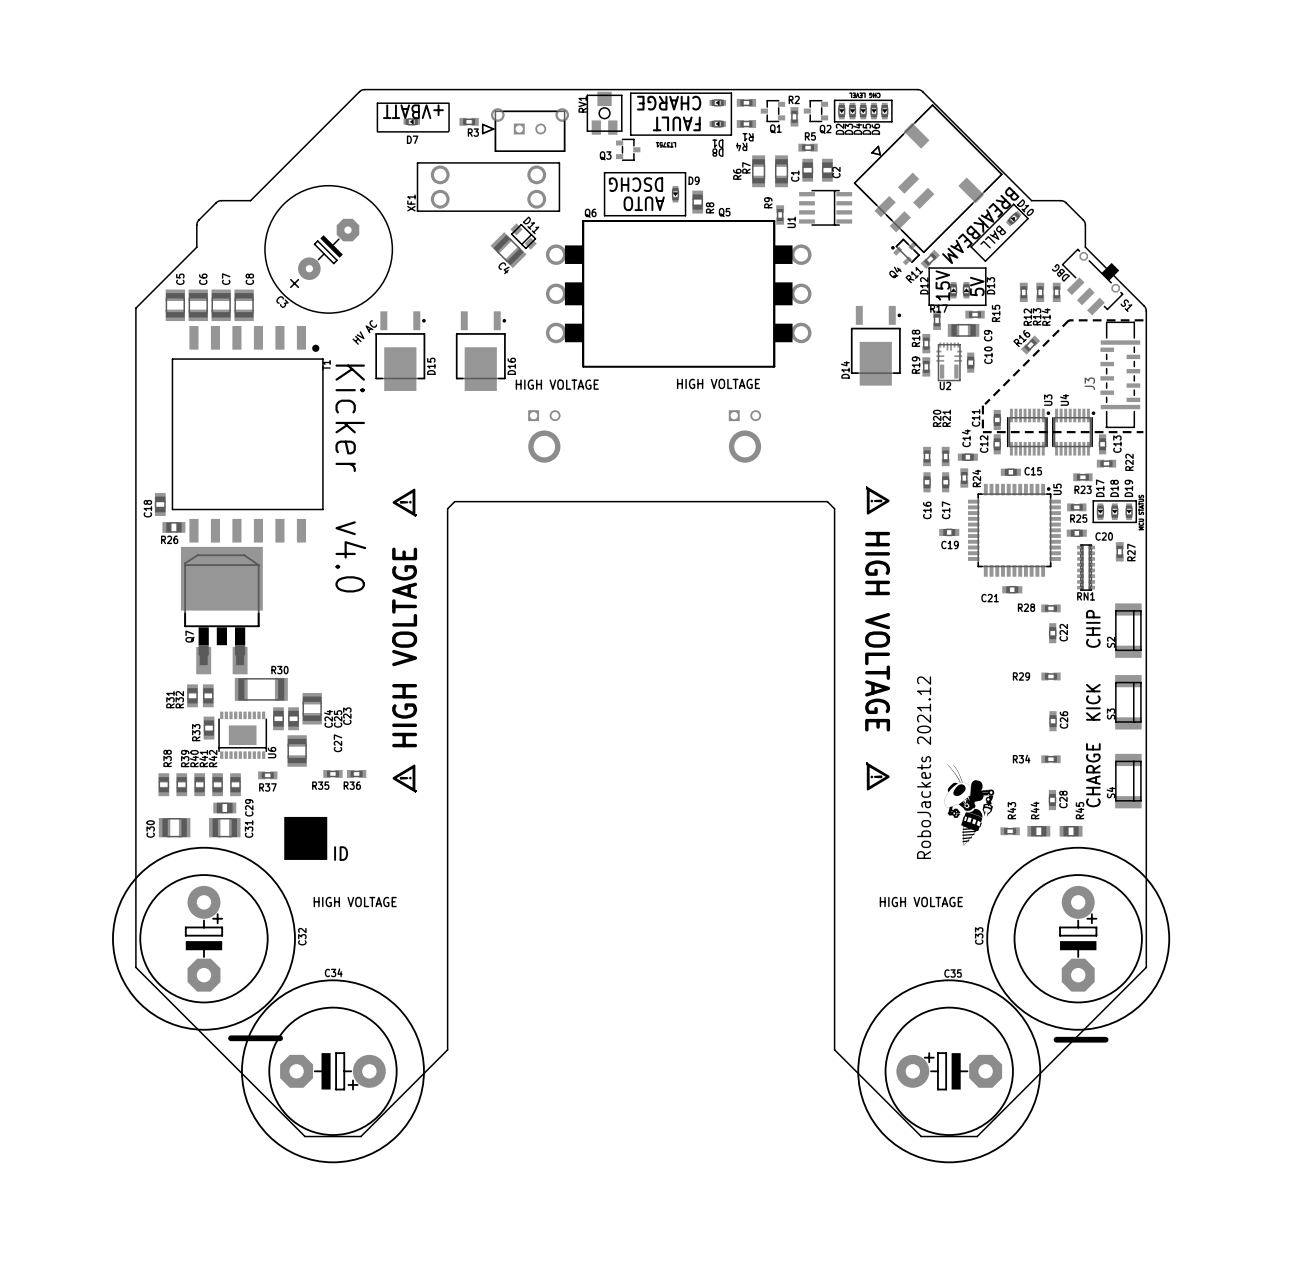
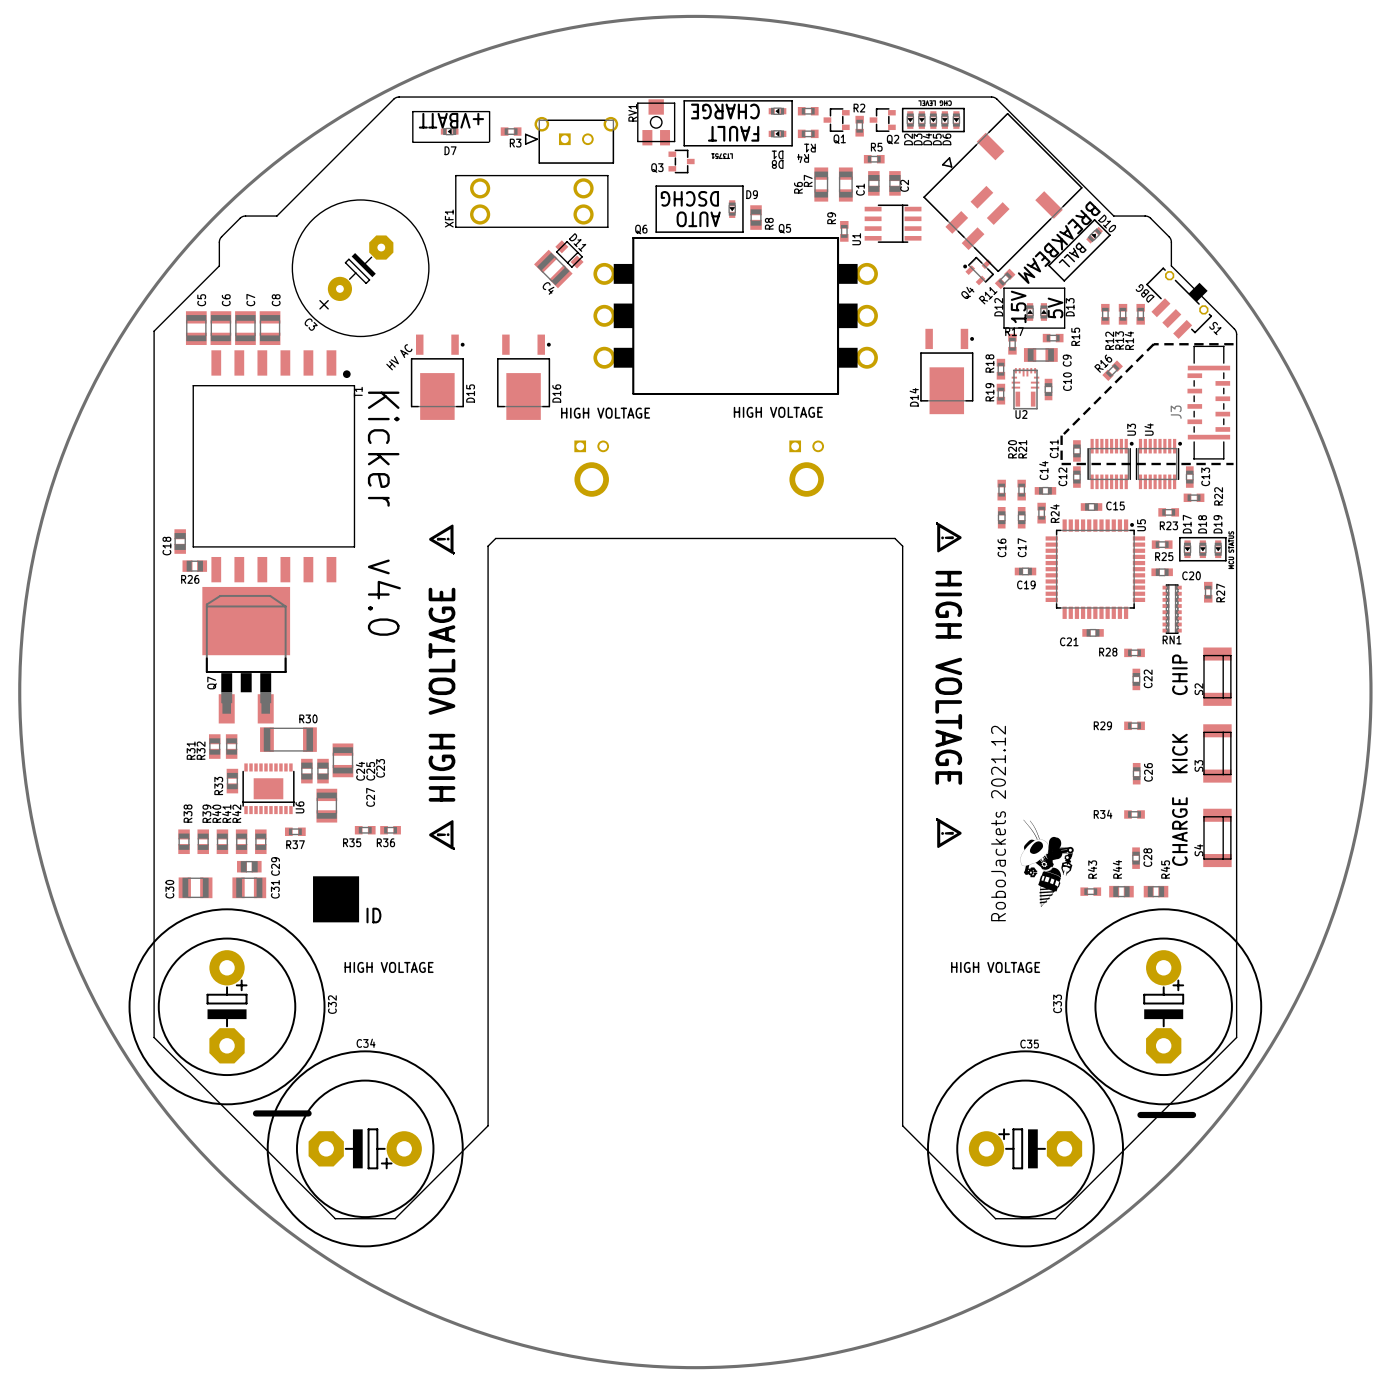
drawing: none -> [18, 14, 1373, 1370]

